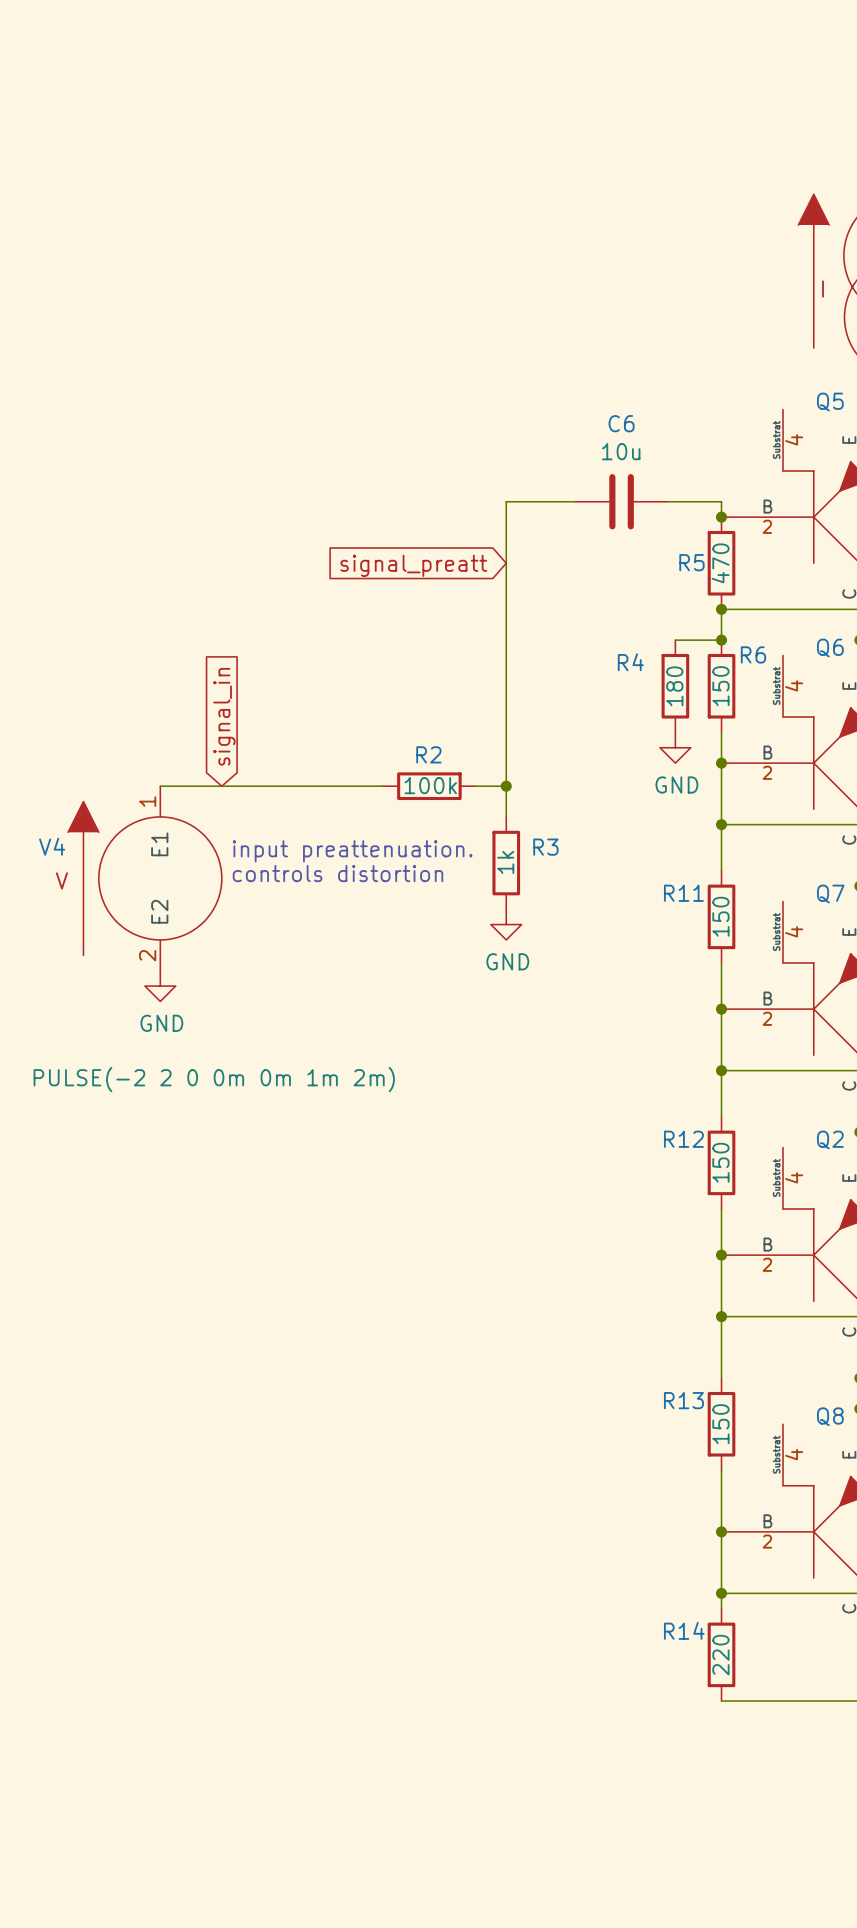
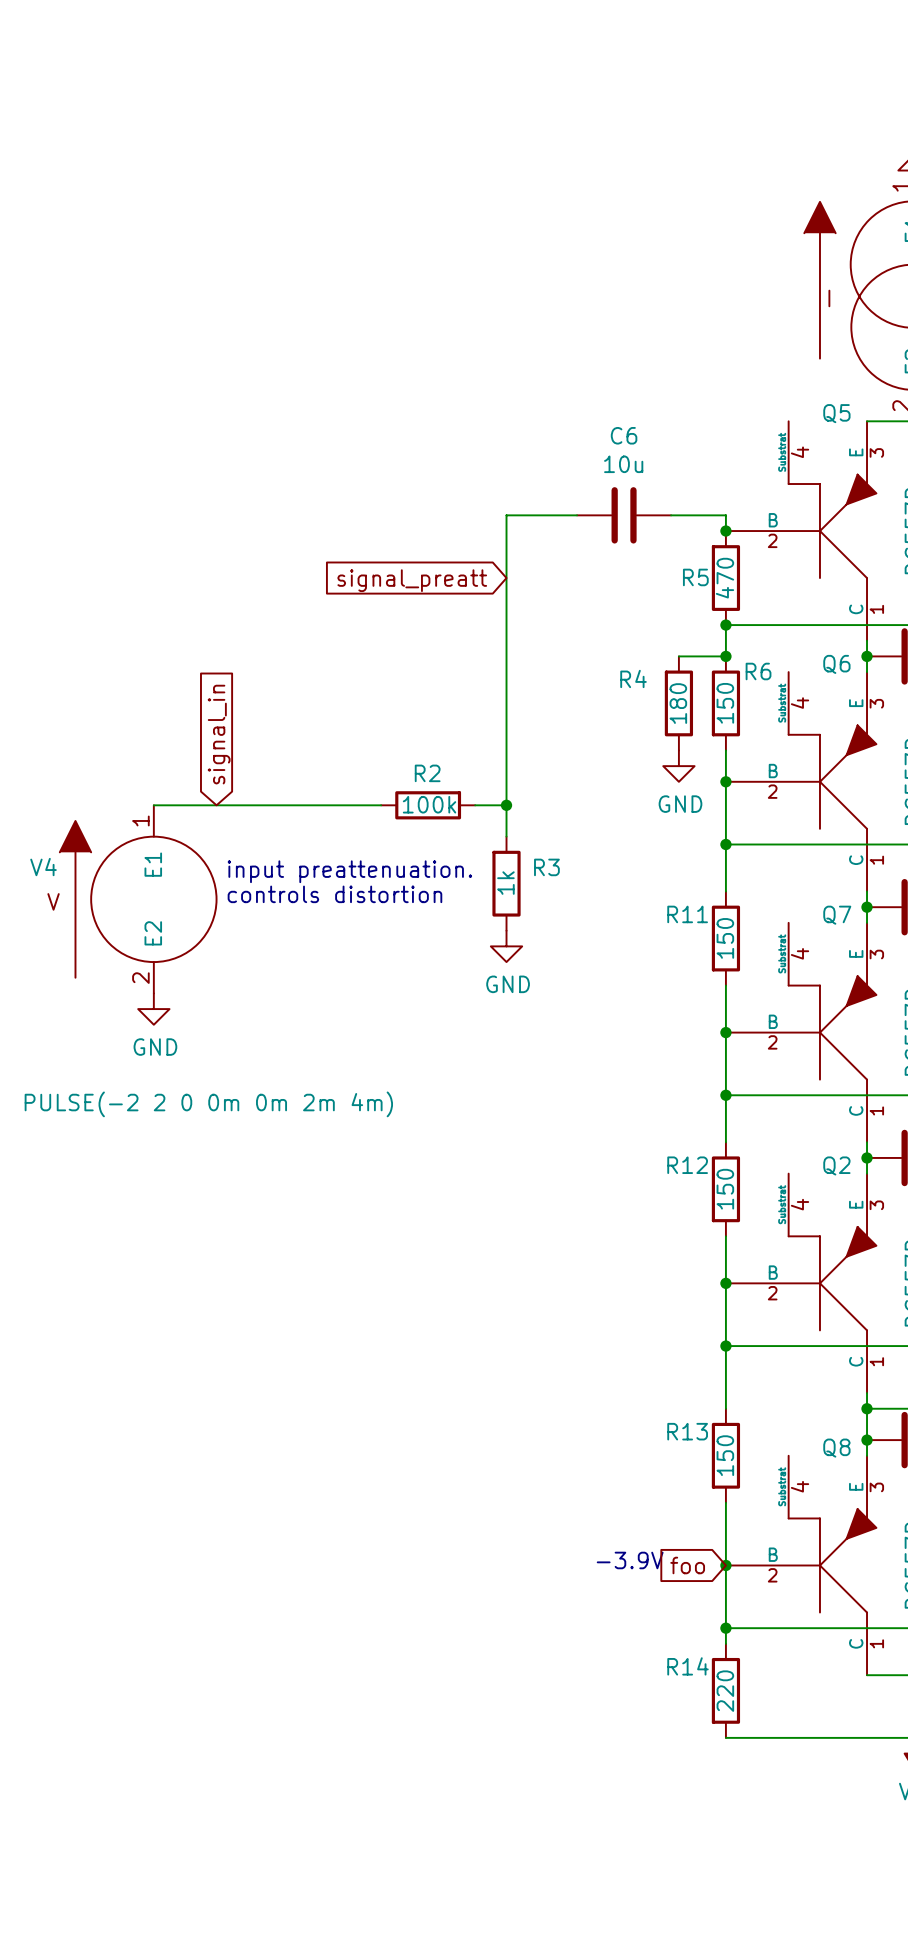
V4 value: PULSE(-2 2 0 0m 0m 1m 2m) (214, 1079) -> PULSE(-2 2 0 0m 0m 2m 4m) (208, 1104)
text: none -> -3.9V (630, 1560)
global label: none -> foo (687, 1565)

